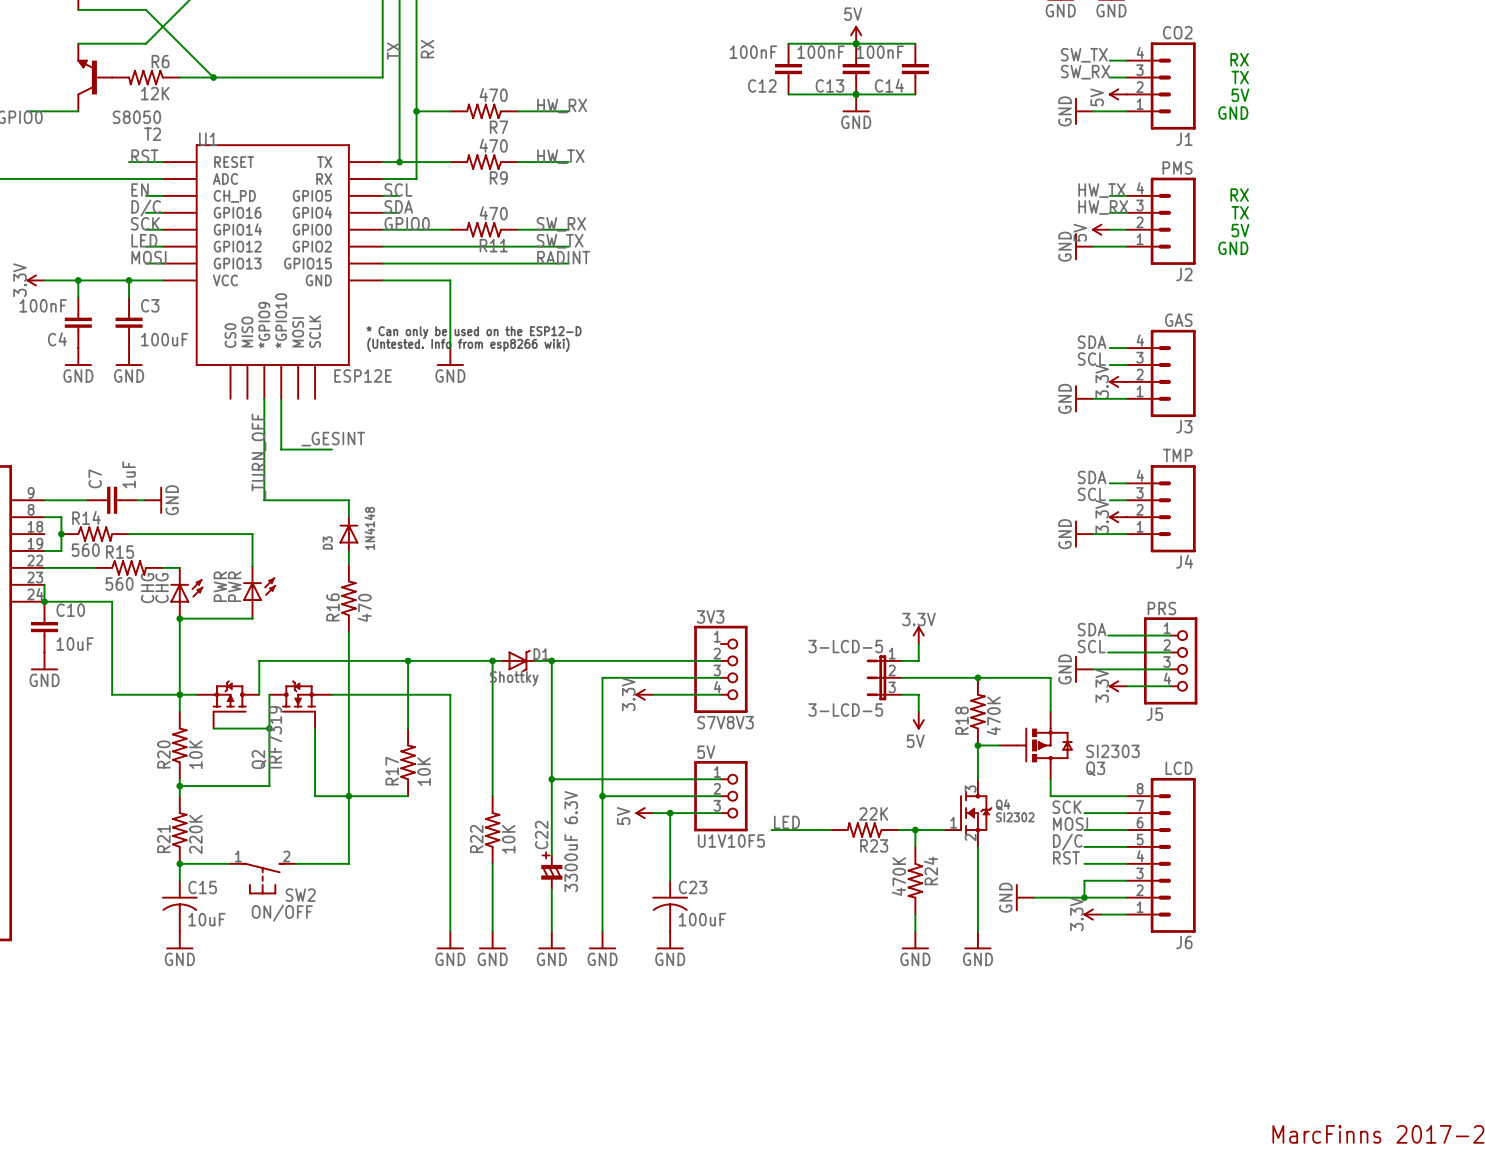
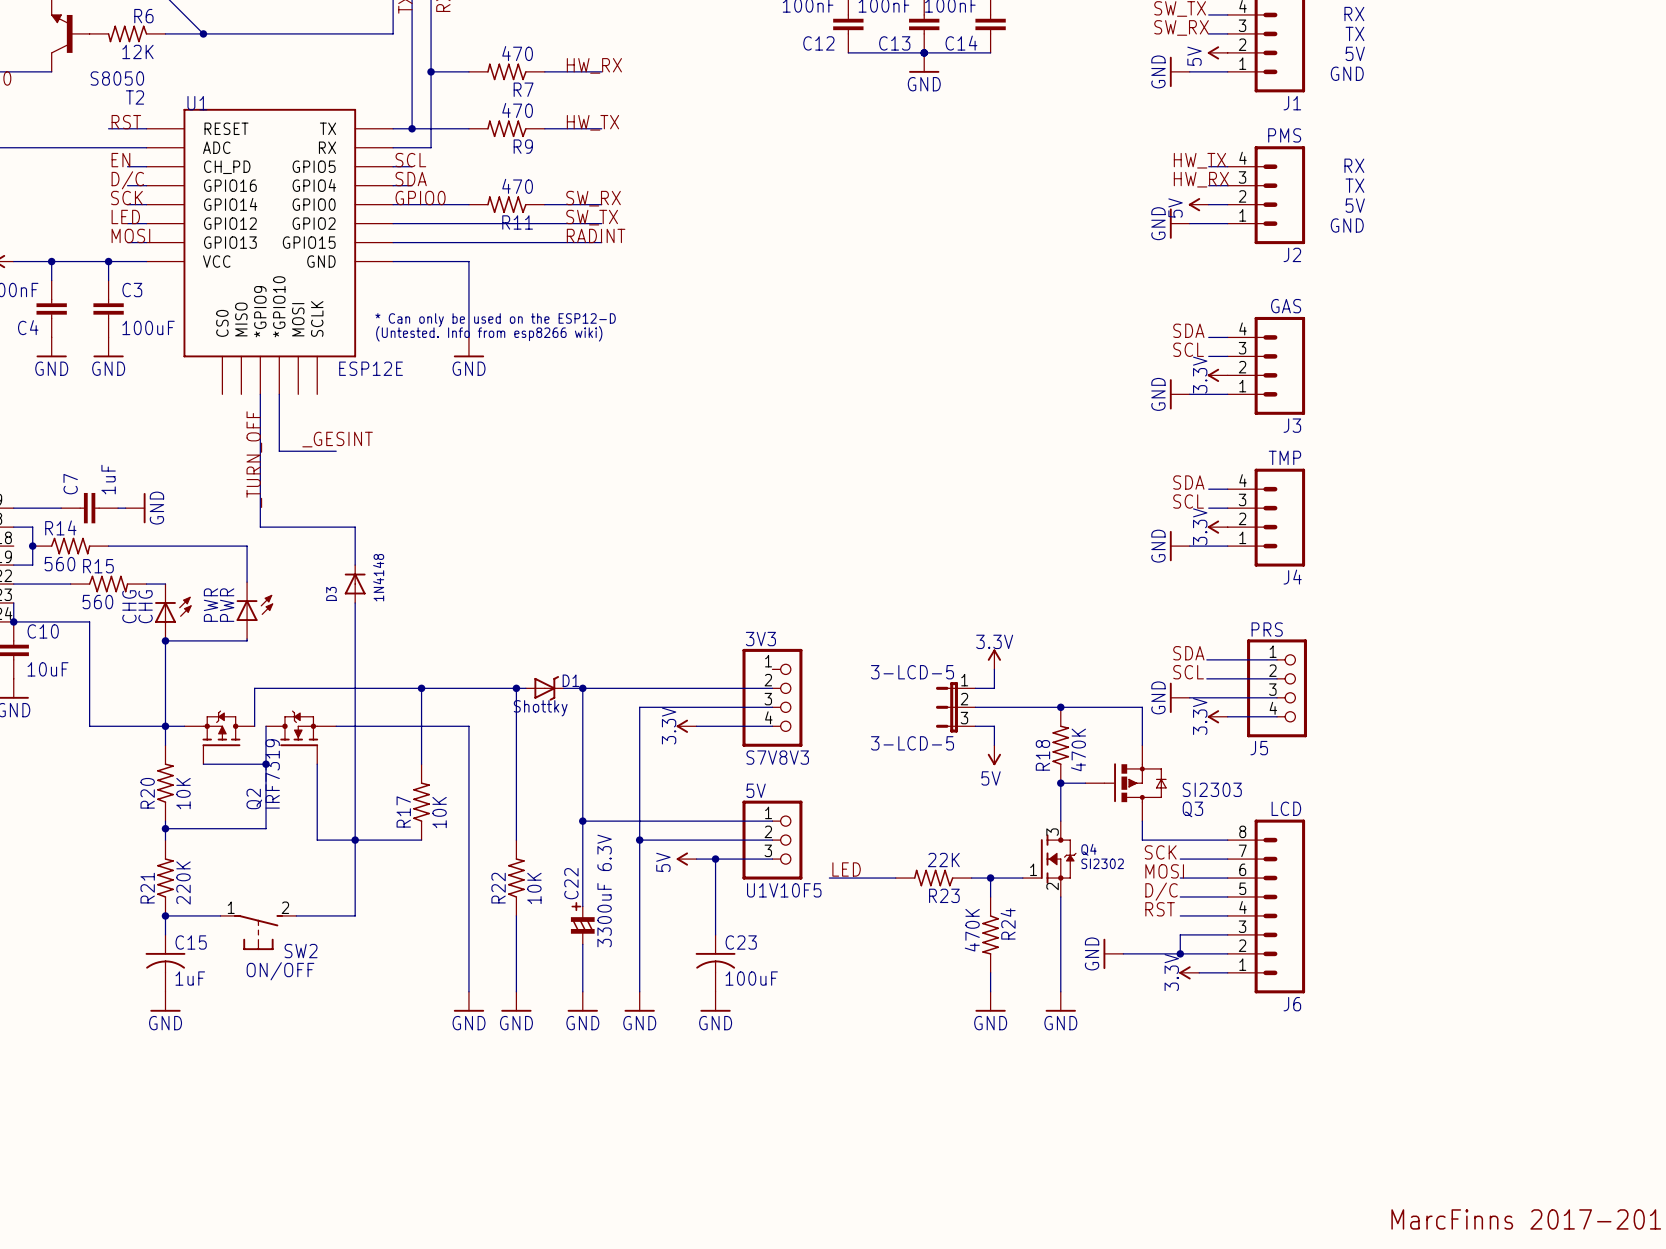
wire: (264, 500) (348, 500) (348, 517) -> (260, 508) (260, 527) (355, 527) (355, 565)
D3 position: (348, 534) -> (355, 584)
R16: 470 (348, 598) -> none
C15 value: 10uF (206, 919) -> 1uF (190, 978)

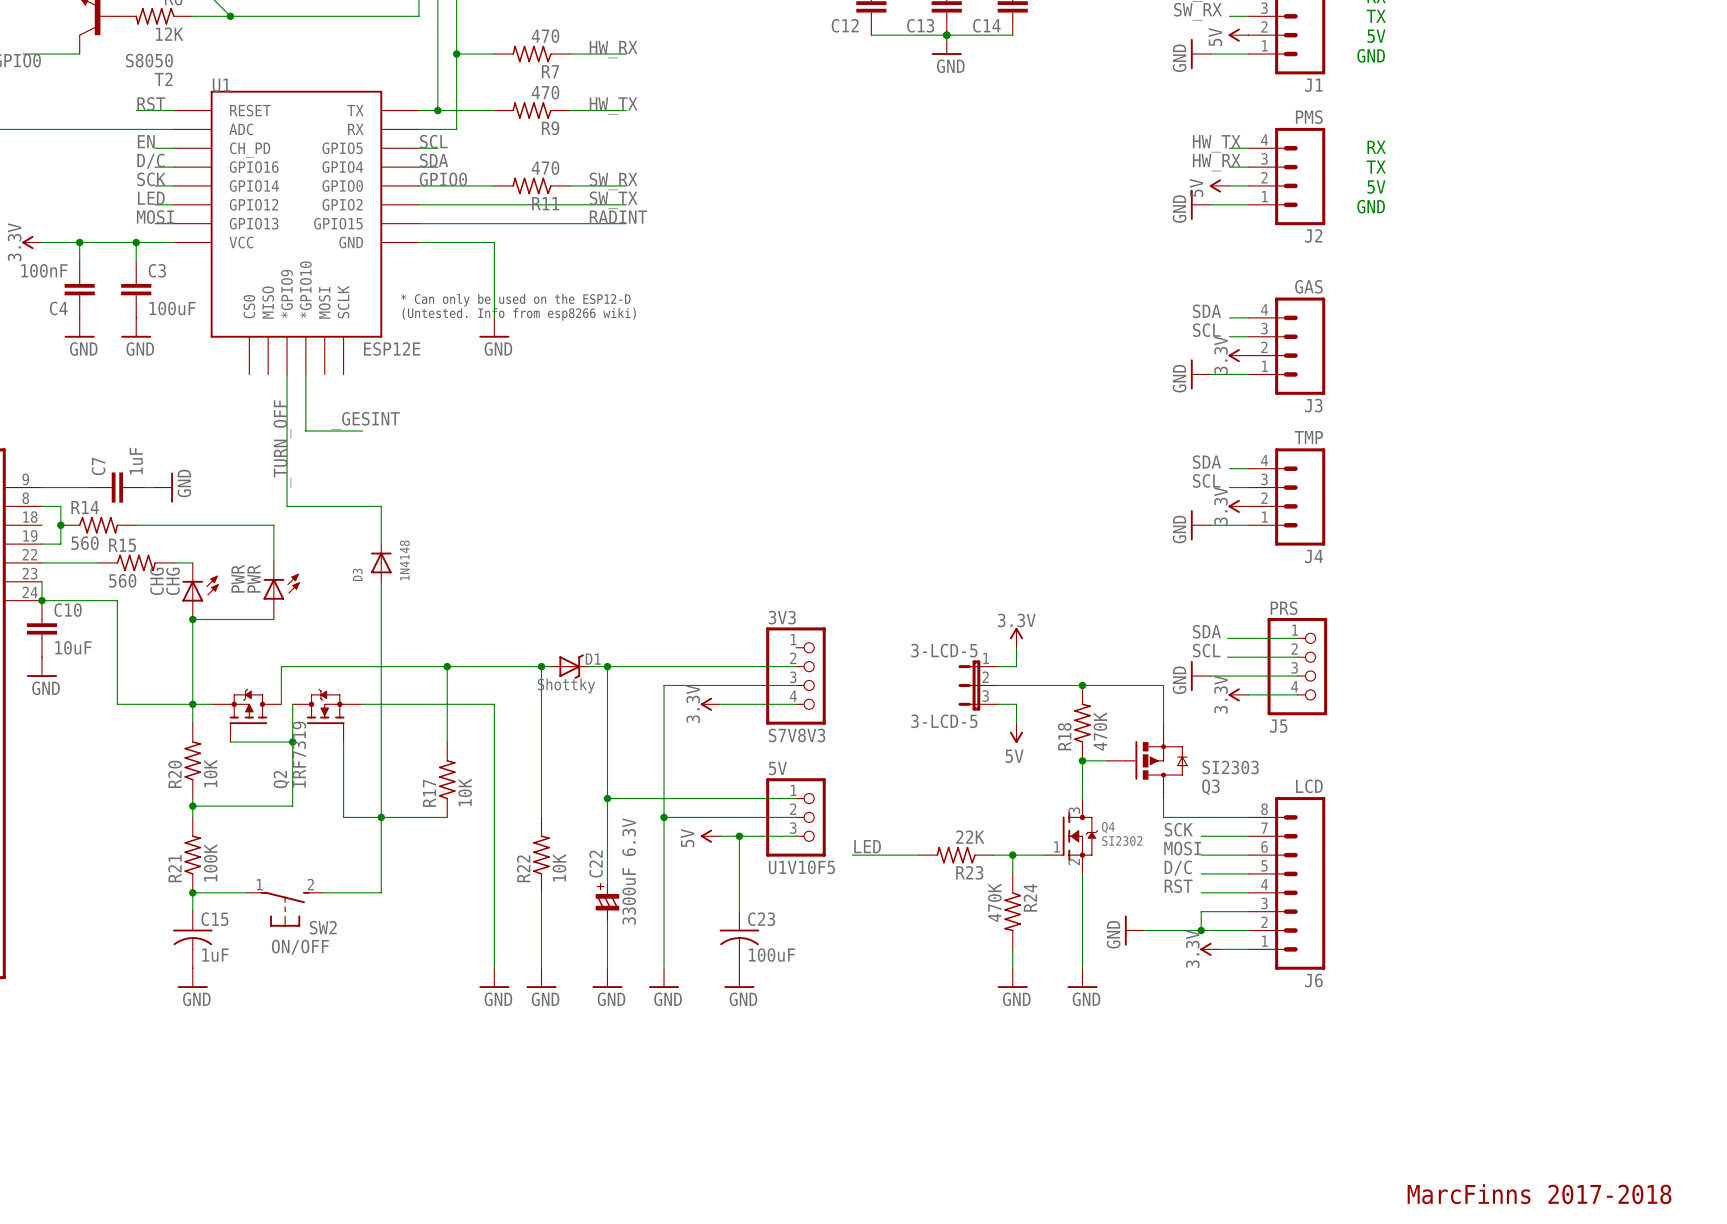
R21 value: 220K (183, 883) -> 100K (210, 862)

